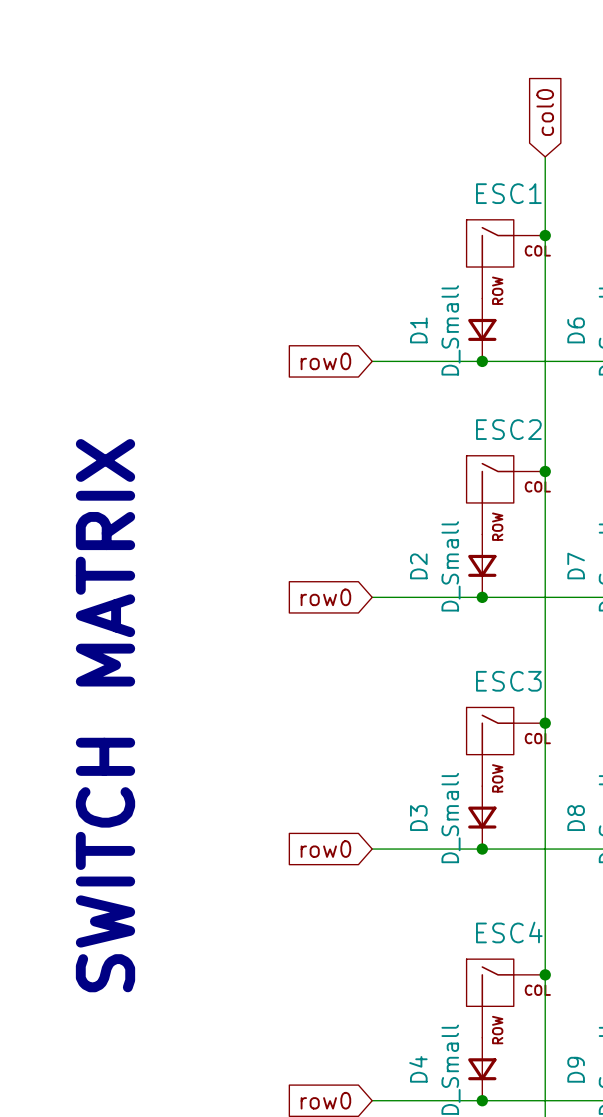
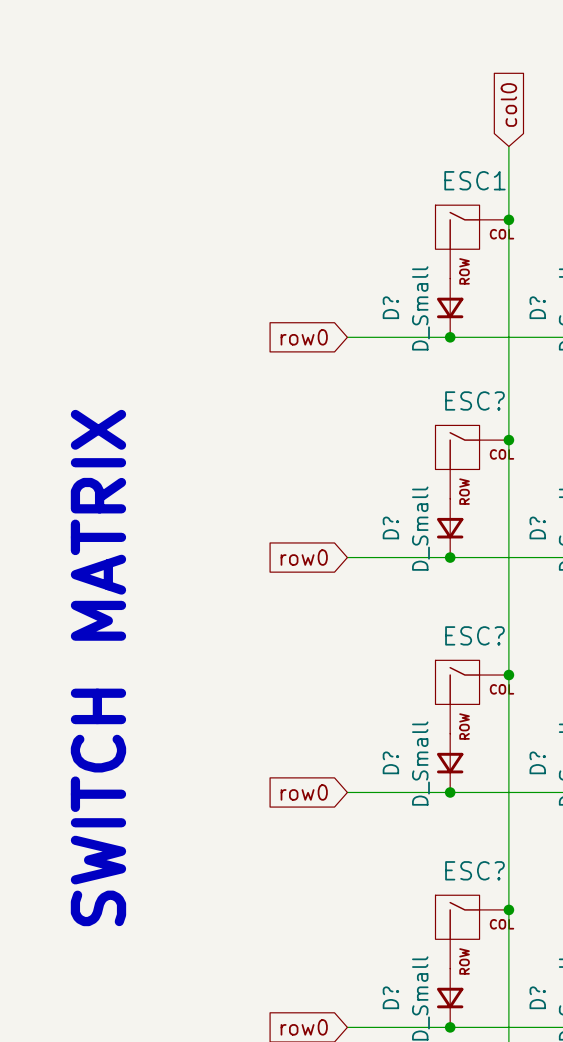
D1 name: D1 (418, 330) -> D? (390, 307)
D6 name: D6 (576, 330) -> D? (537, 307)
ESC2 name: ESC2 (508, 429) -> ESC? (474, 400)
D2 name: D2 (418, 566) -> D? (390, 527)
D7 name: D7 (576, 566) -> D? (537, 527)
ESC3 name: ESC3 (508, 681) -> ESC? (474, 635)
D3 name: D3 (418, 818) -> D? (390, 762)
D8 name: D8 (576, 818) -> D? (537, 762)
ESC4 name: ESC4 (509, 932) -> ESC? (474, 870)
D4 name: D4 (418, 1069) -> D? (390, 997)
D9 name: D9 (576, 1069) -> D? (537, 997)

